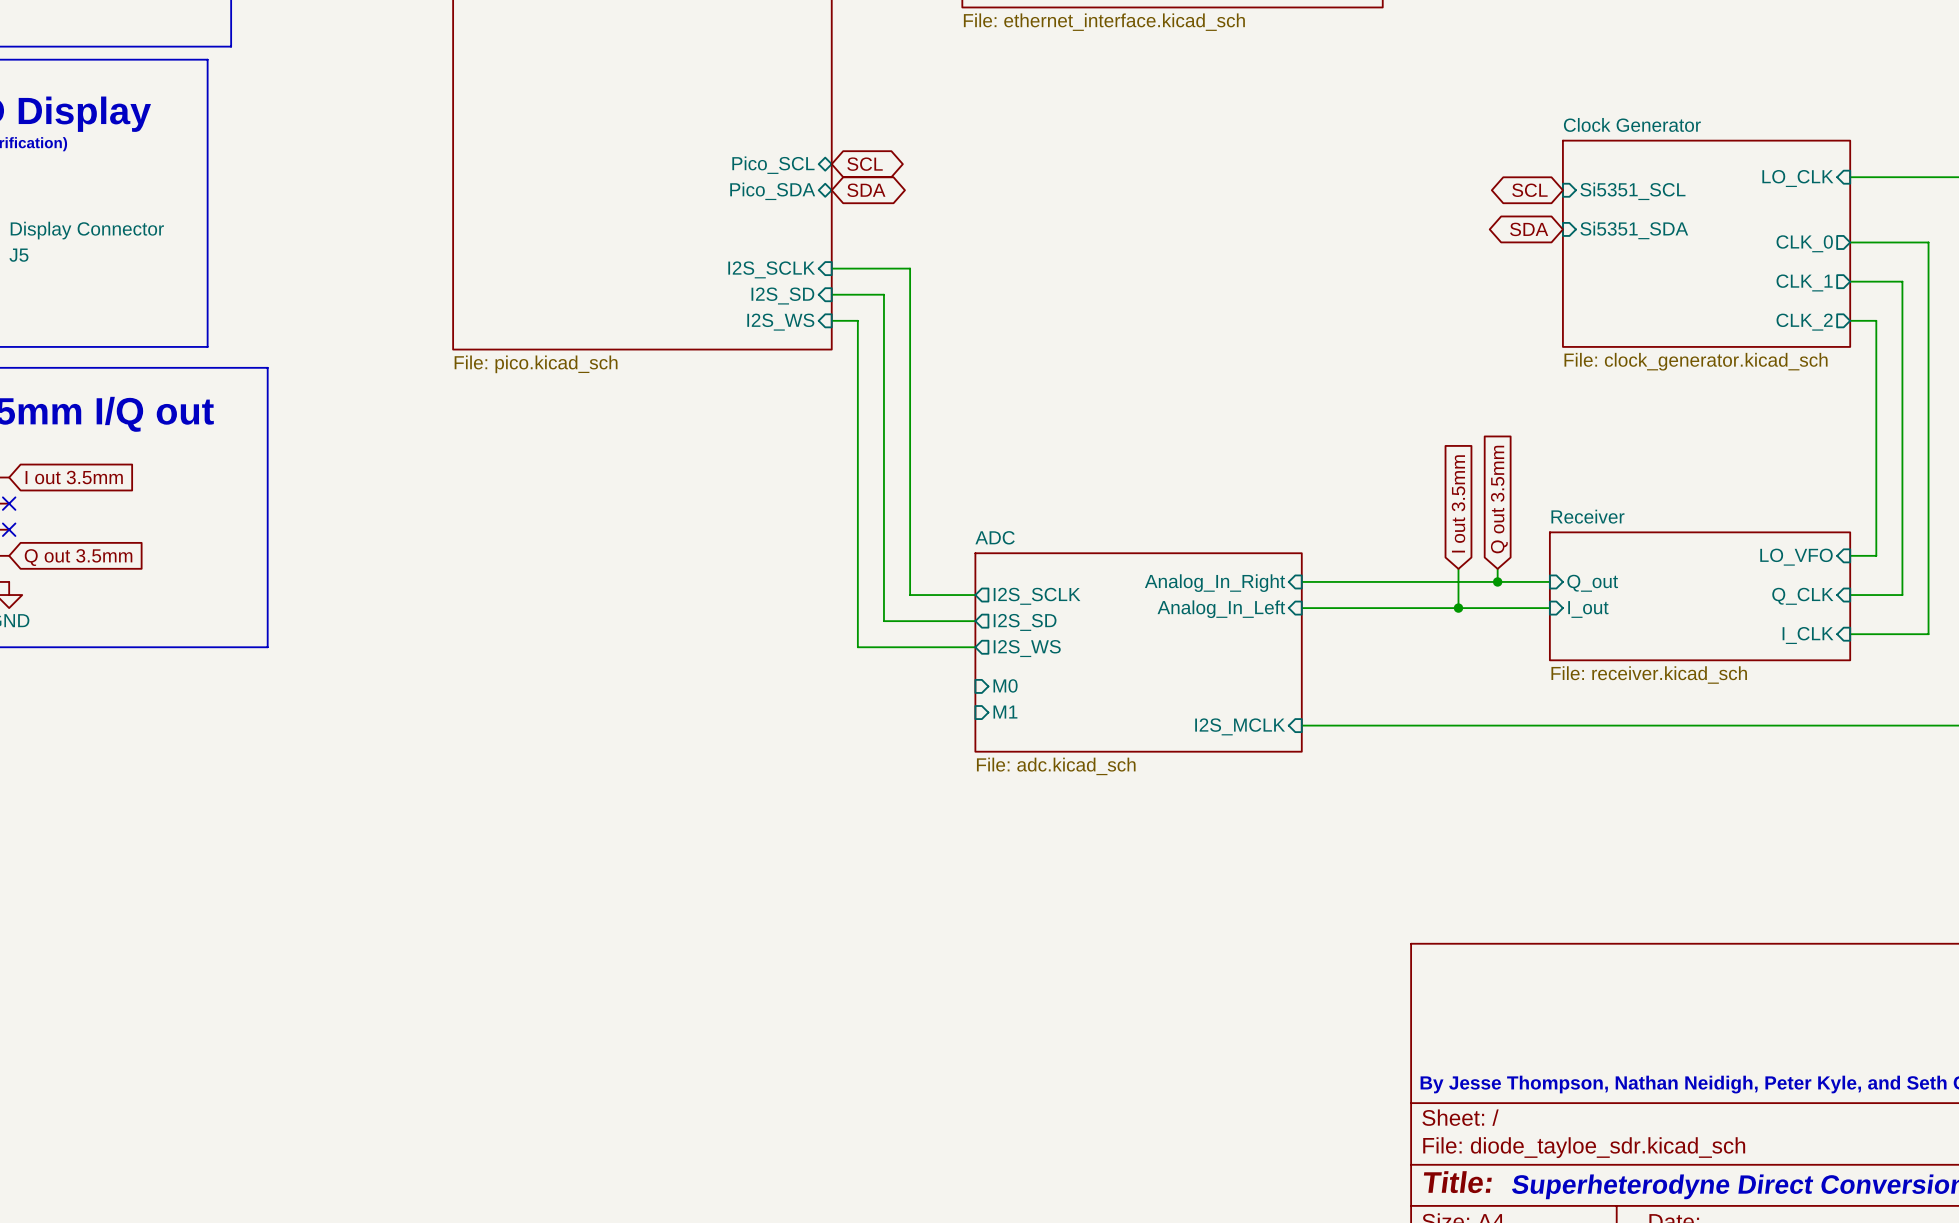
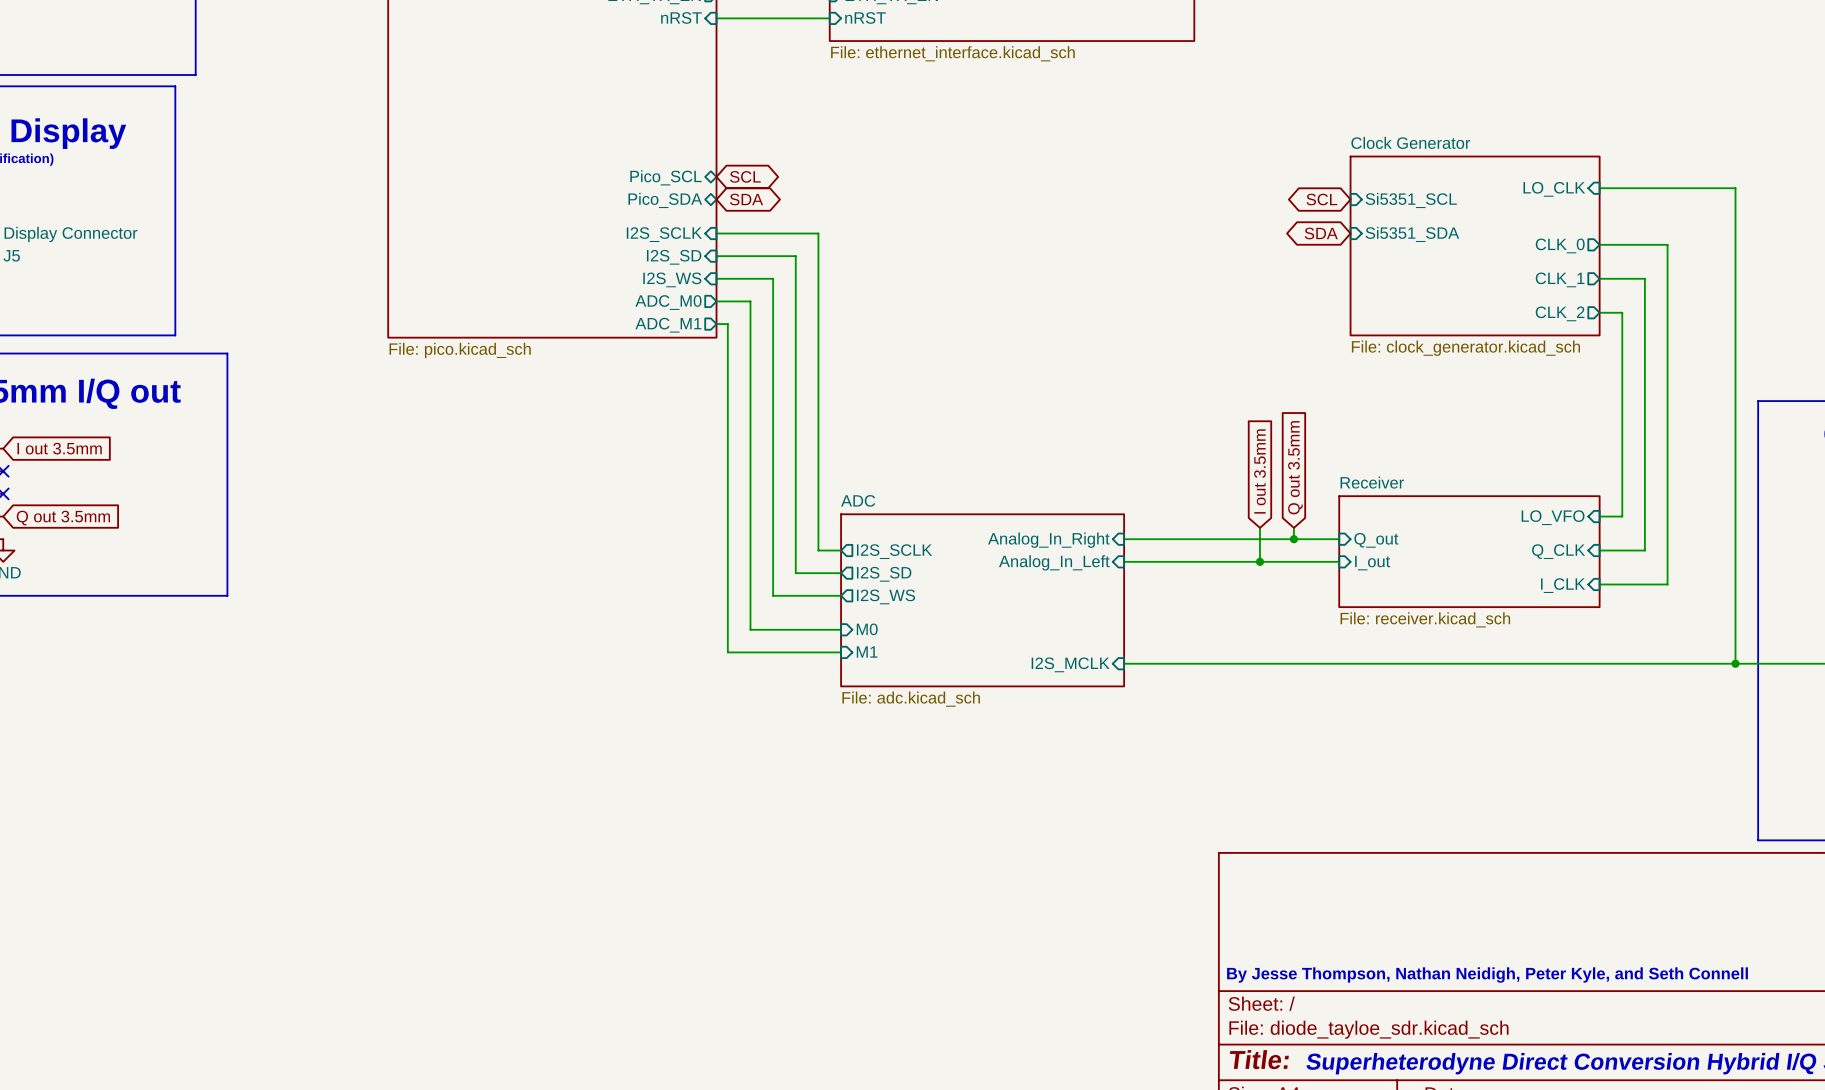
wire: (831, 268) (910, 268) (910, 595) (949, 595) -> (716, 233) (818, 233) (818, 550)
sheet pin position: I2S_SCLK (771, 269) -> I2S_SCLK (664, 234)
wire: (831, 294) (883, 294) (883, 621) (923, 621) -> (716, 256) (795, 256) (795, 573)
sheet pin position: I2S_SD (782, 296) -> I2S_SD (674, 257)
wire: none -> (716, 301) (750, 301) (750, 629) (841, 629)
sheet pin: none -> ADC_M0 (668, 302)
wire: (831, 320) (857, 320) (857, 647) (897, 647) -> (716, 278) (773, 278) (773, 595)
sheet pin position: I2S_WS (780, 322) -> I2S_WS (672, 279)
wire: none -> (716, 324) (727, 324) (727, 652) (841, 652)
sheet pin: none -> ADC_M1 (668, 325)

